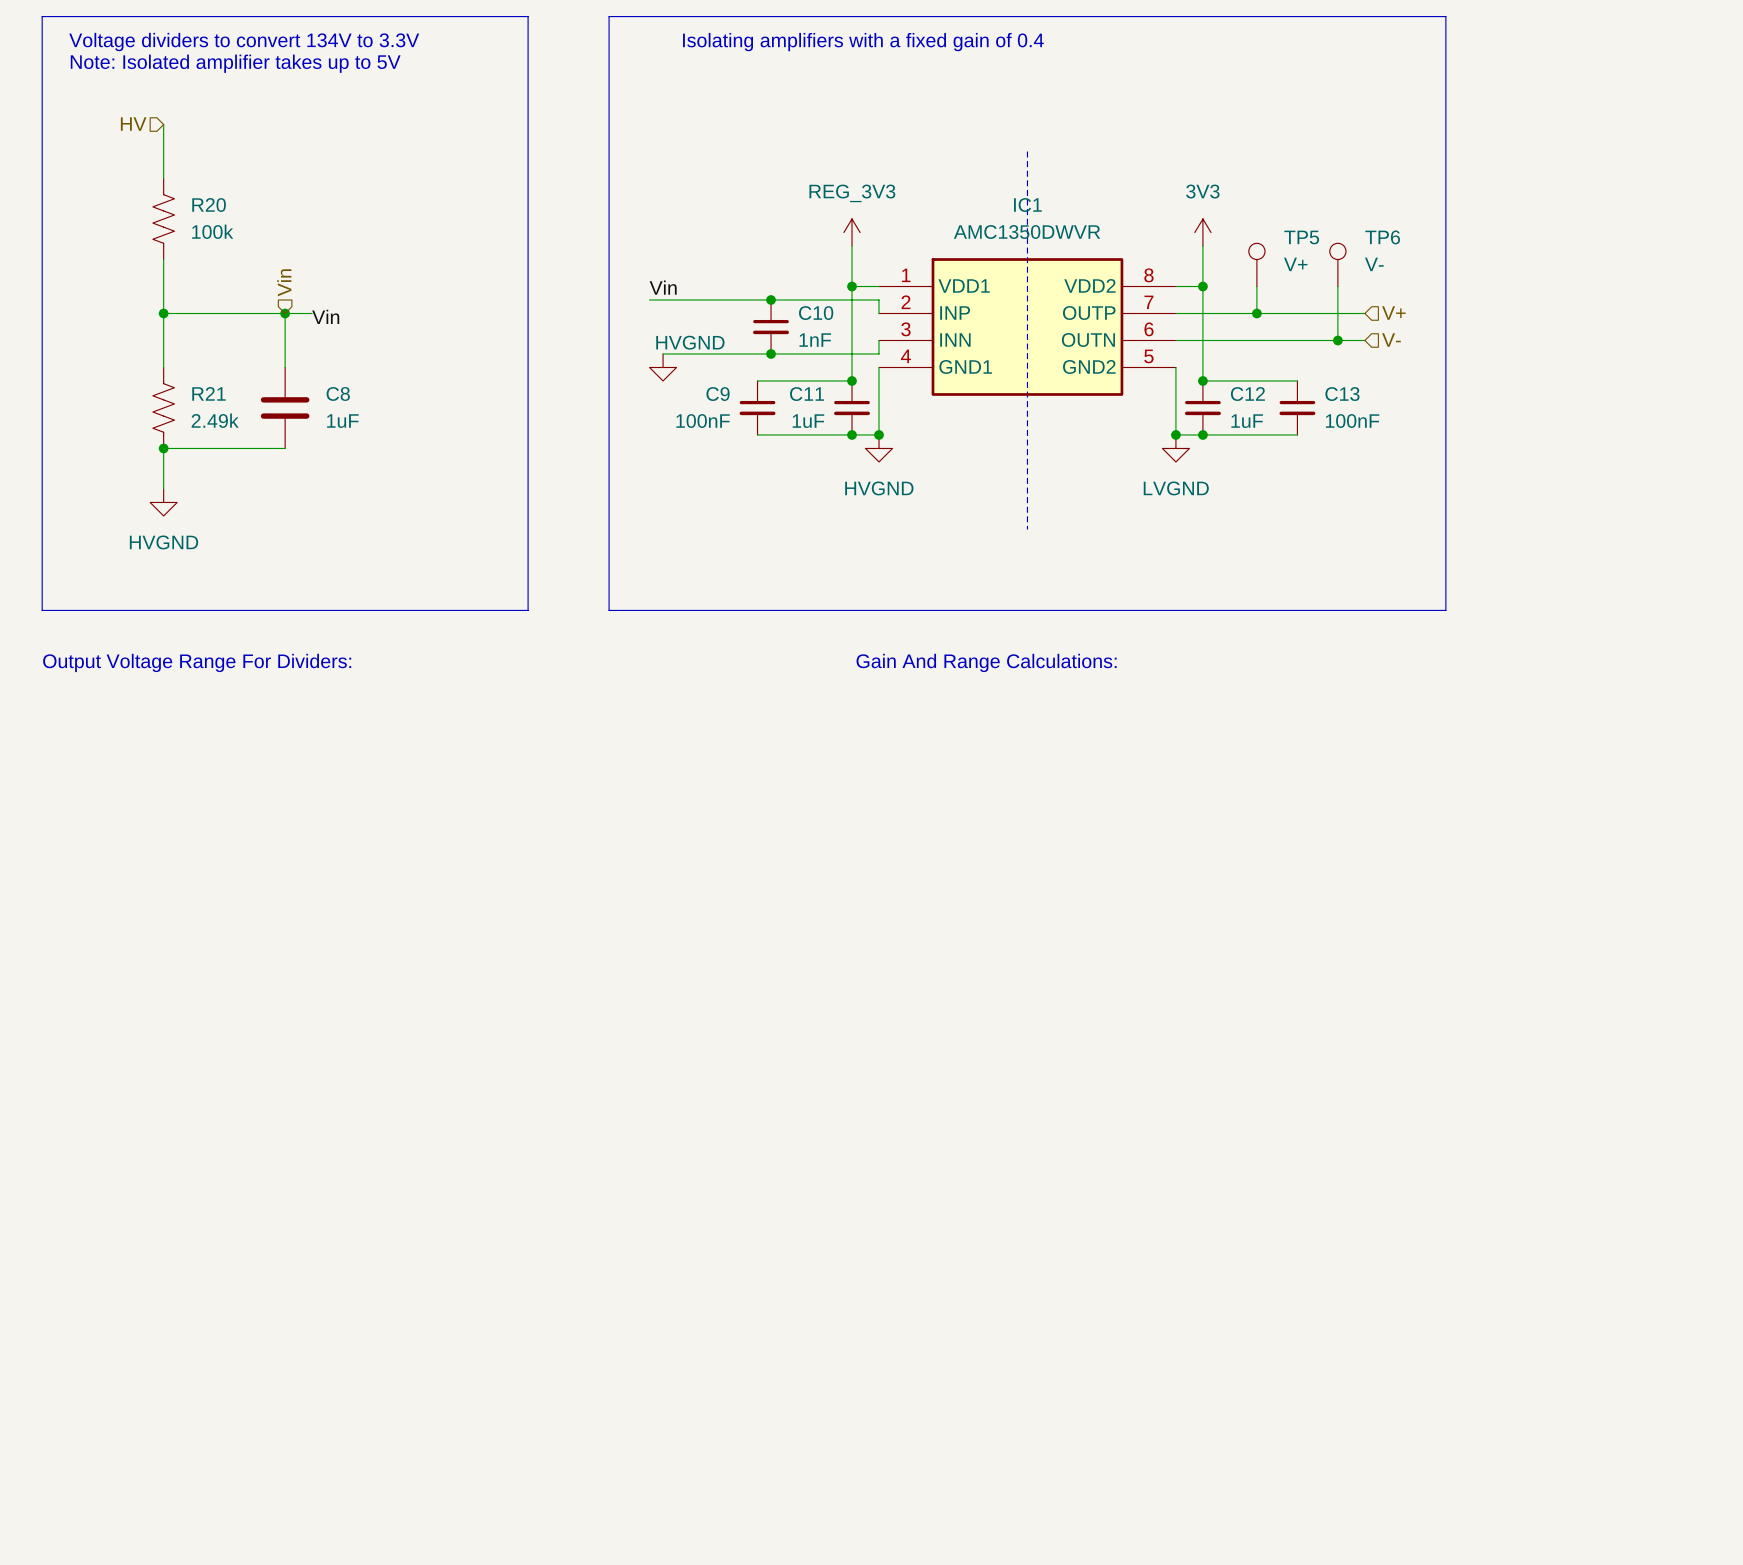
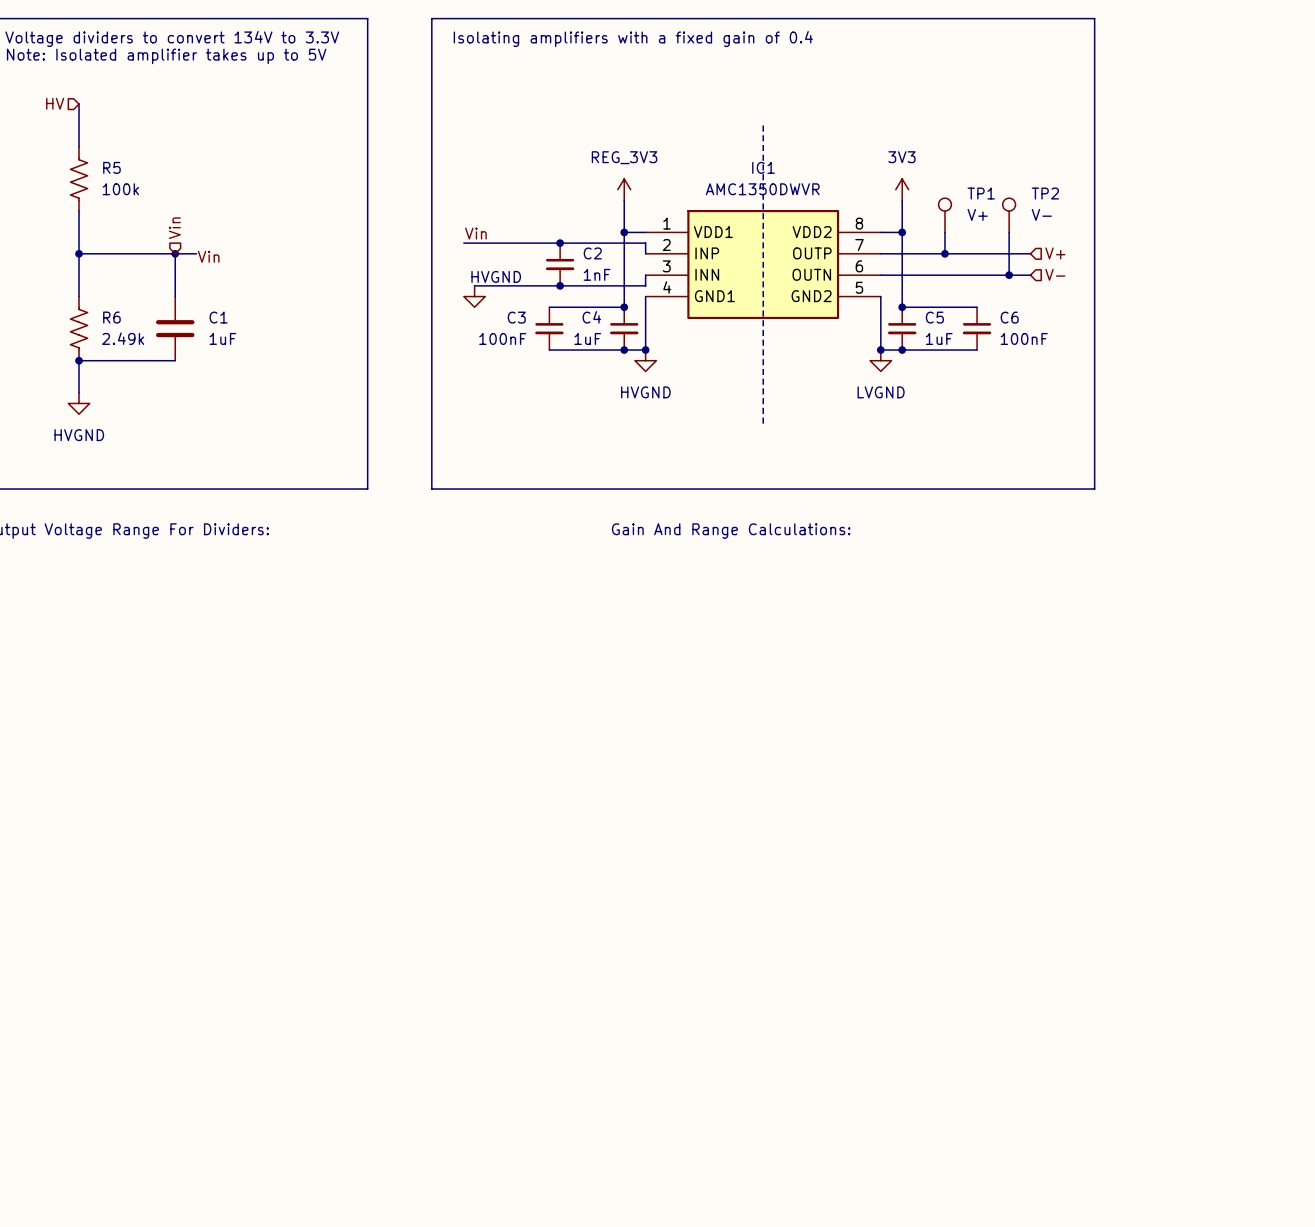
R20 name: R20 (209, 205) -> R5 (111, 167)
TP5 name: TP5 (1301, 237) -> TP1 (981, 193)
TP6 name: TP6 (1382, 237) -> TP2 (1045, 193)
C10 name: C10 (816, 313) -> C2 (592, 253)
R21 name: R21 (208, 393) -> R6 (111, 317)
C8 name: C8 (338, 393) -> C1 (218, 317)
C9 name: C9 (718, 394) -> C3 (516, 317)
C11 name: C11 (807, 394) -> C4 (591, 317)
C12 name: C12 (1247, 394) -> C5 (934, 317)
C13 name: C13 (1342, 394) -> C6 (1009, 317)

